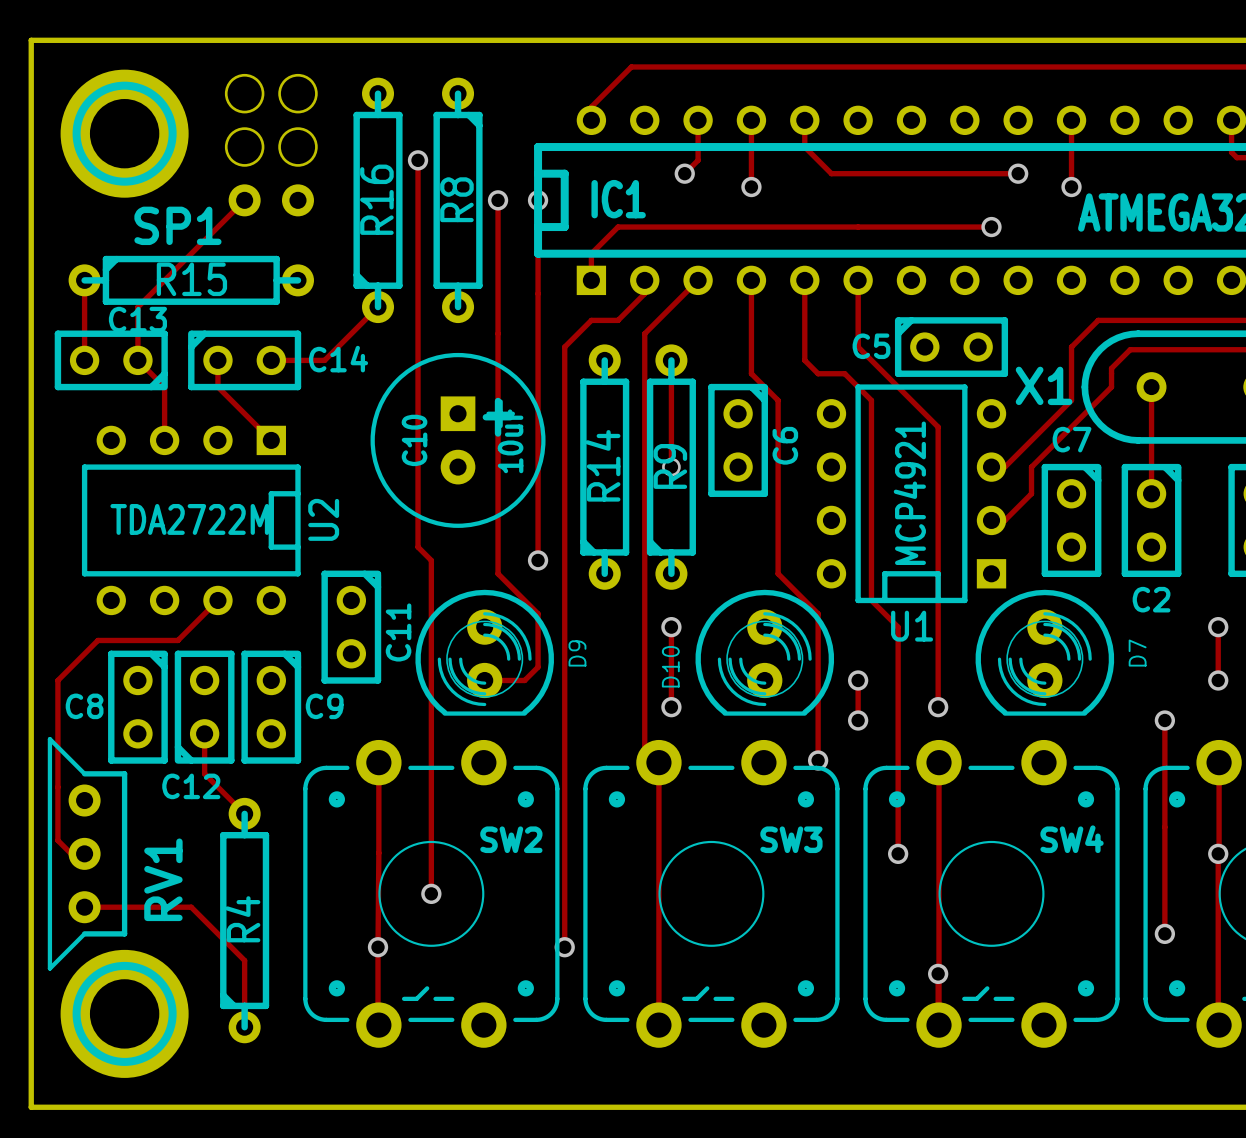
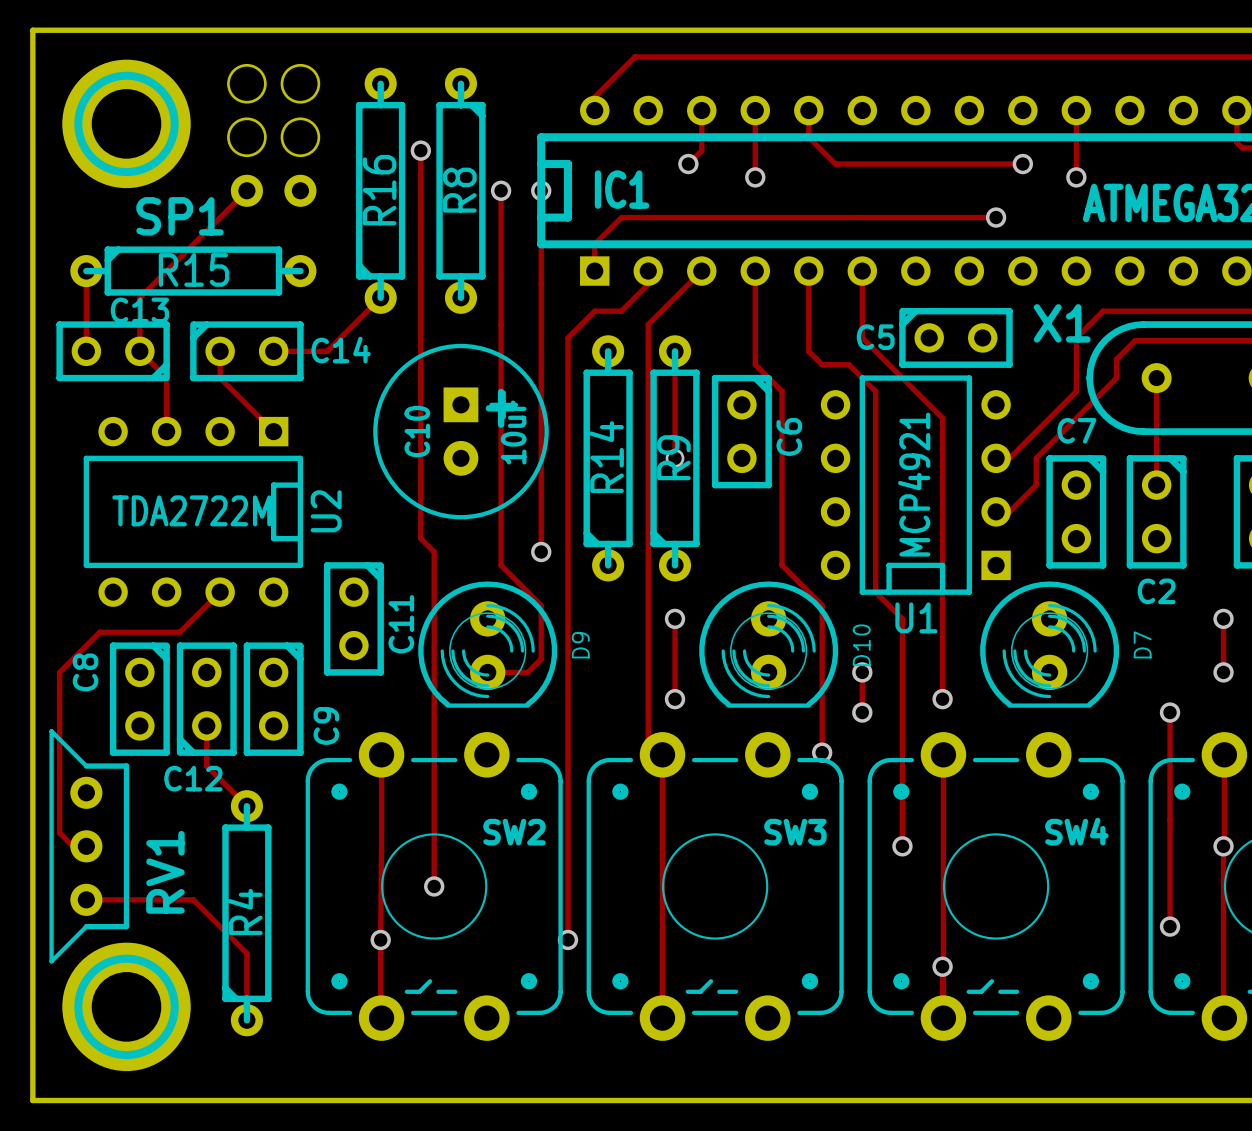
X1 name position: X1 (1044, 385) -> X1 (1062, 323)
D10 name position: D10 (670, 666) -> D10 (861, 645)
C8 name rotation: 0° (84, 706) -> 90° counterclockwise (85, 672)
C9 name rotation: 0° (324, 706) -> 90° counterclockwise (326, 725)

